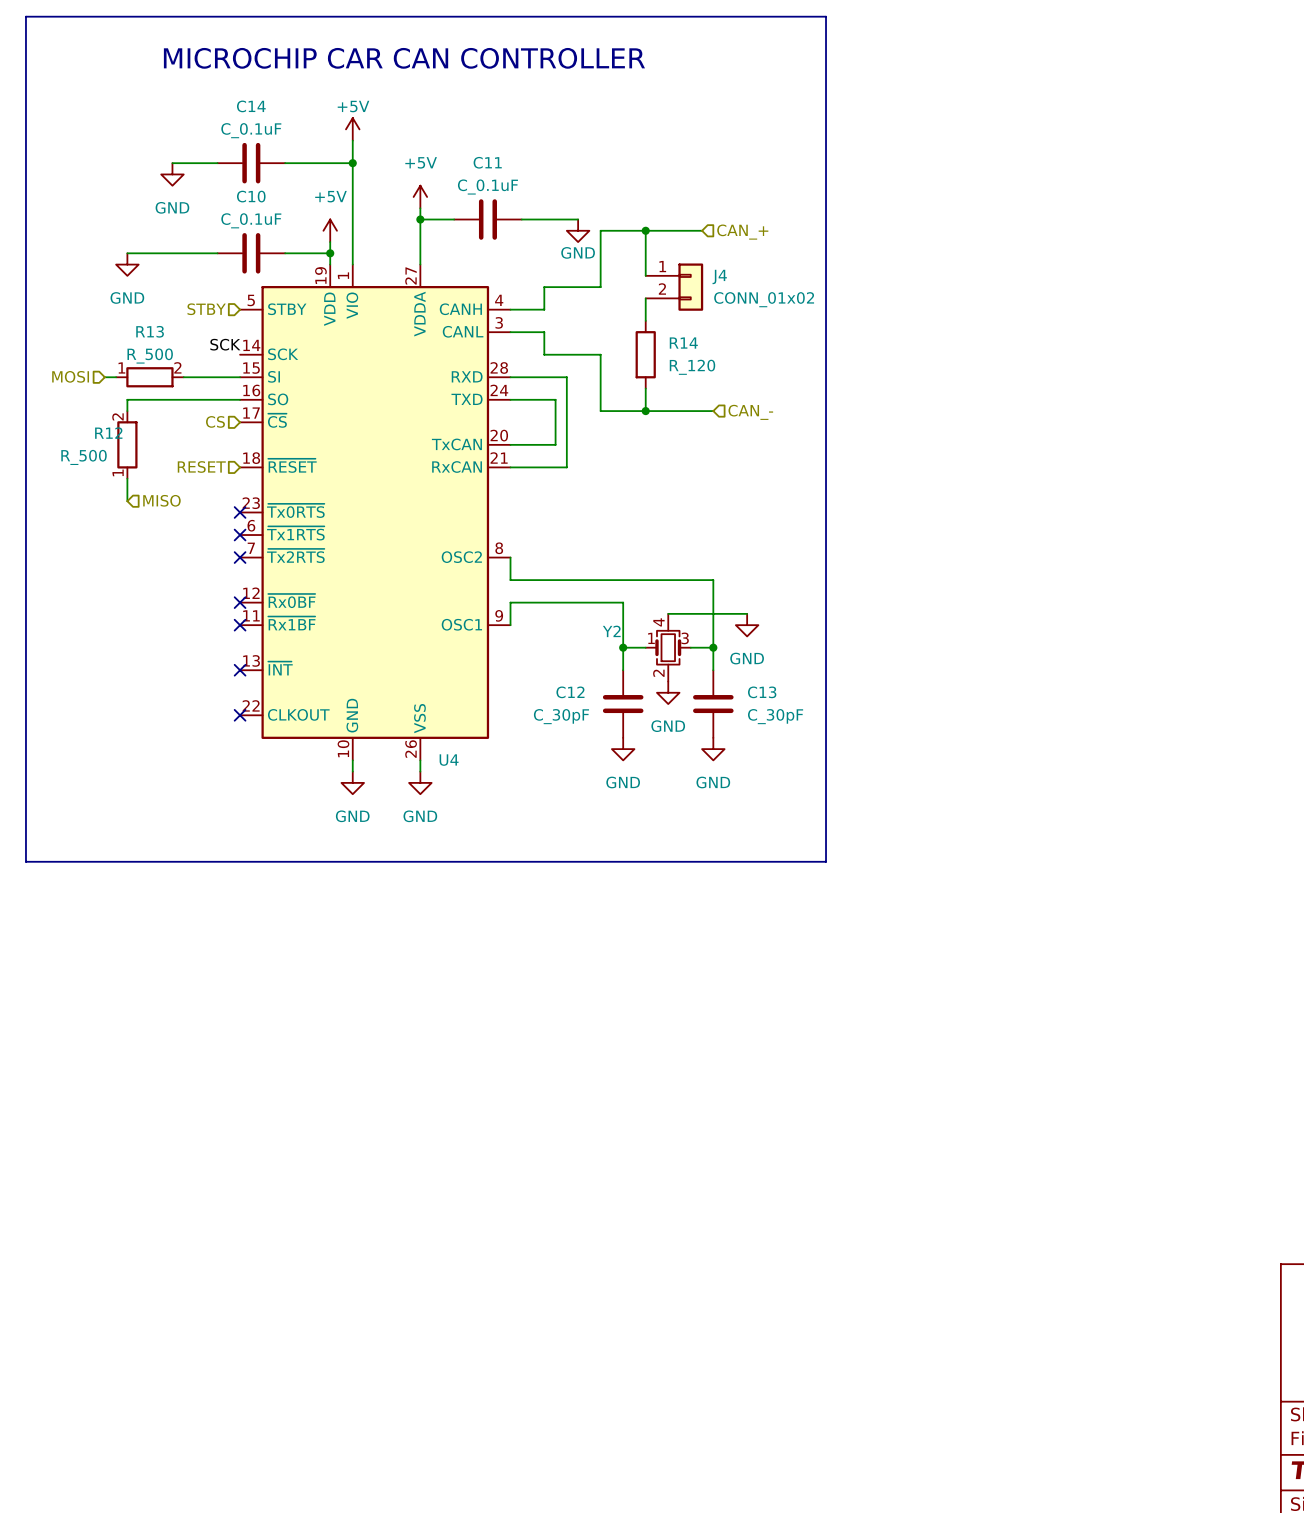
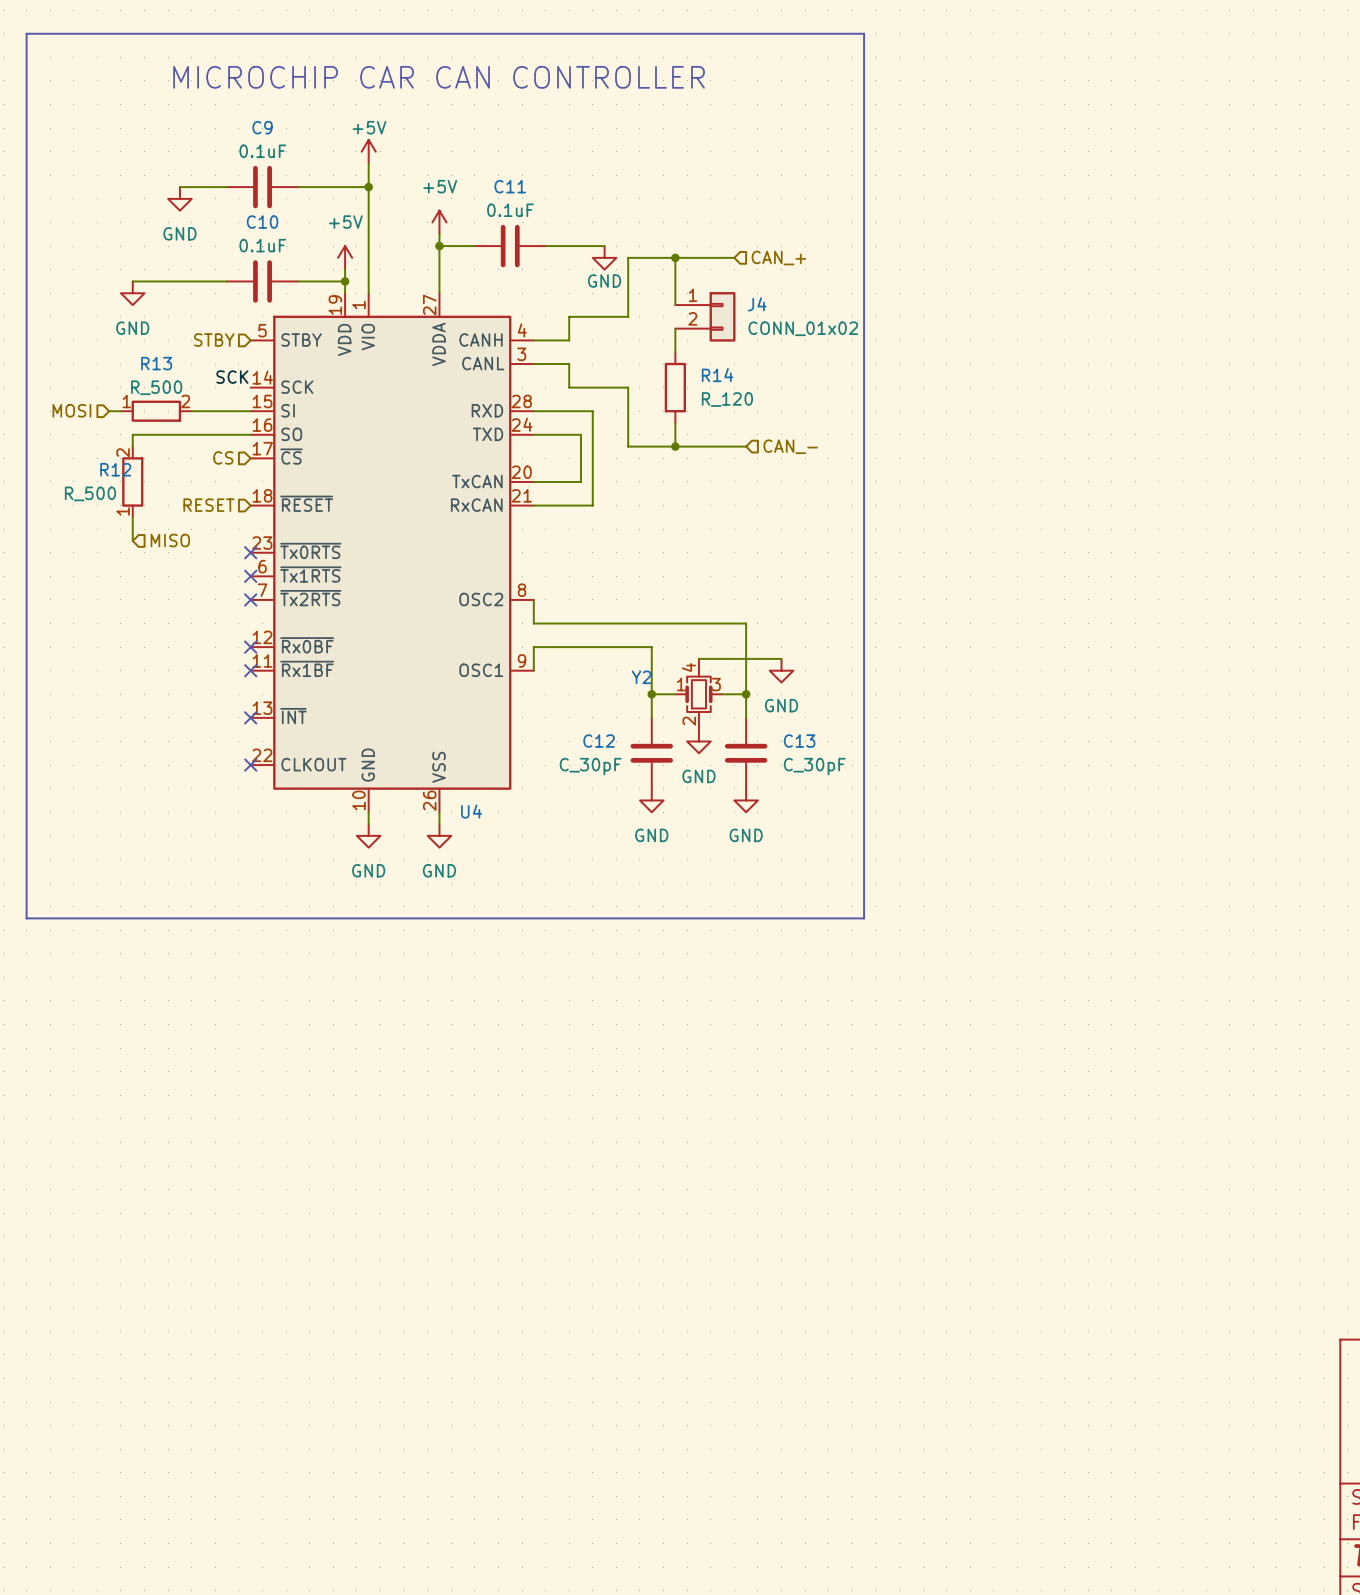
C14 name: C14 (251, 106) -> C9 (262, 127)
C14 value: C_0.1uF (251, 130) -> 0.1uF (262, 151)
C11 value: C_0.1uF (487, 187) -> 0.1uF (510, 210)
C10 value: C_0.1uF (251, 220) -> 0.1uF (262, 245)

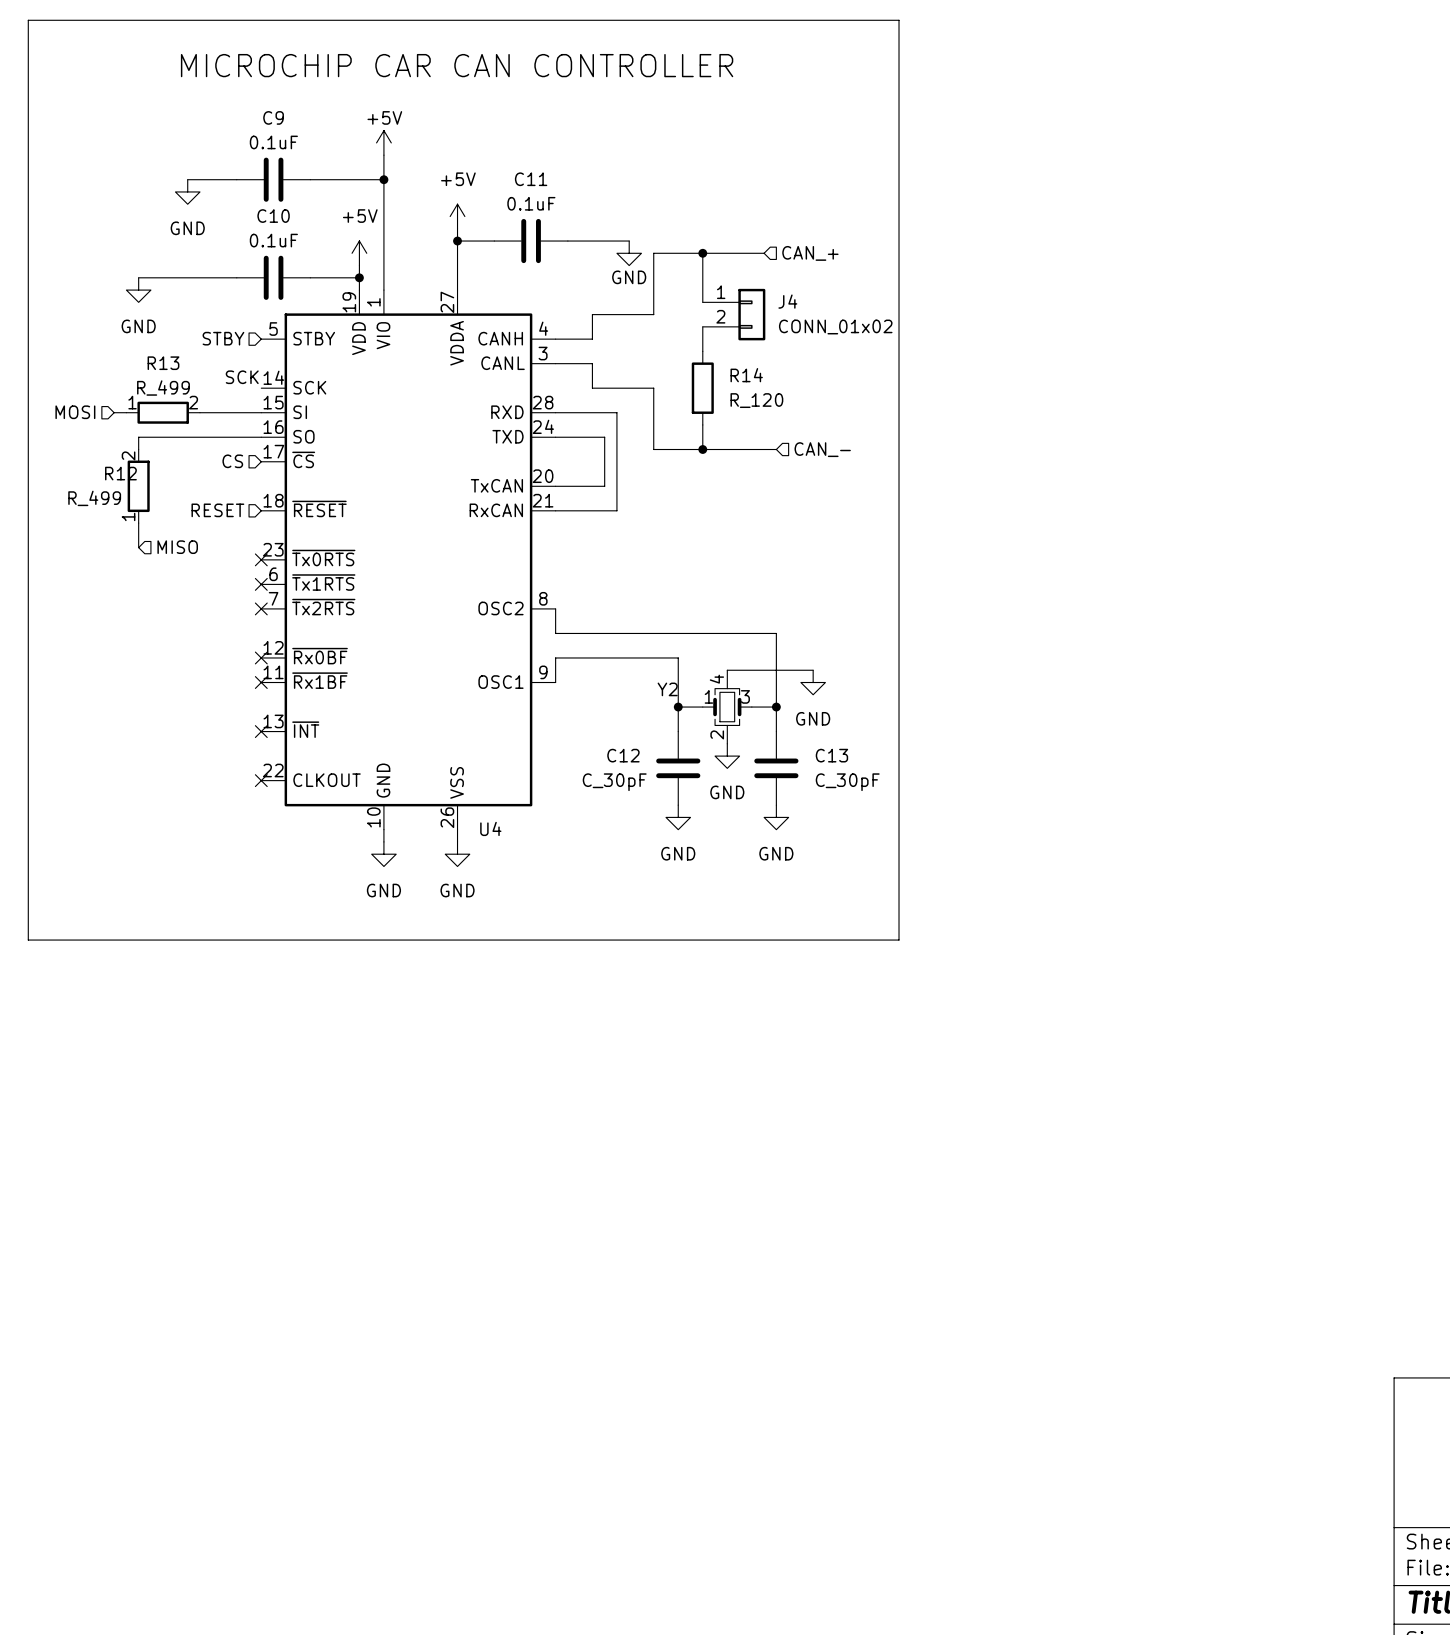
R13 value: R_500 (156, 387) -> R_499 (163, 388)
R12 value: R_500 (90, 493) -> R_499 (94, 498)

